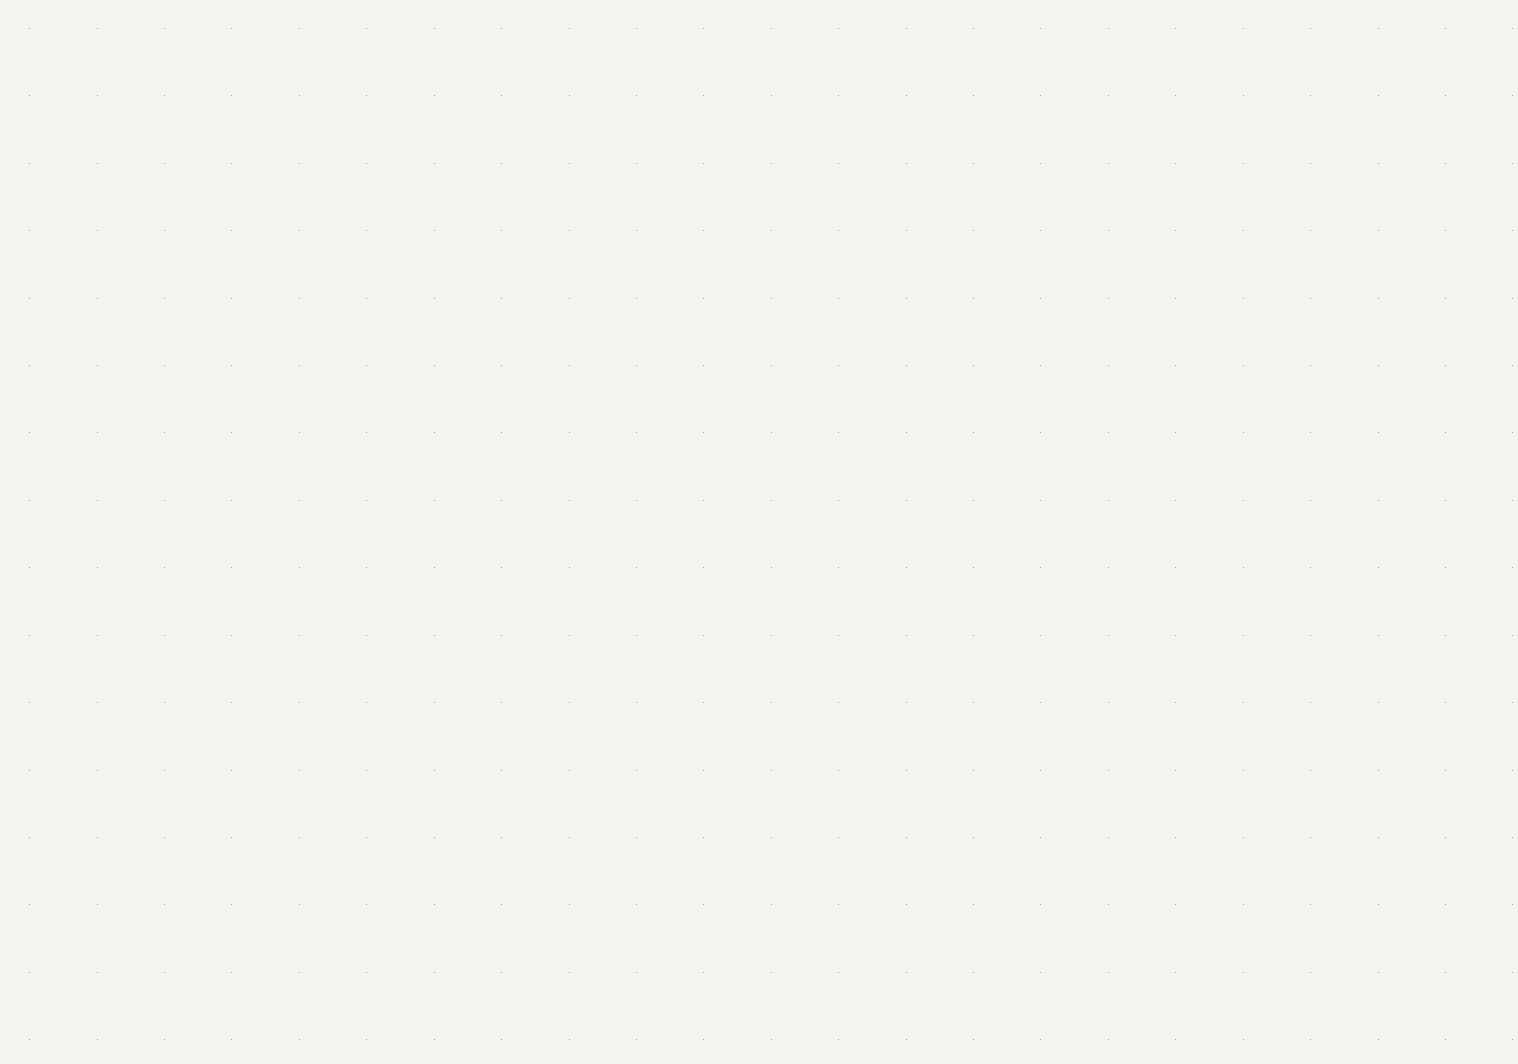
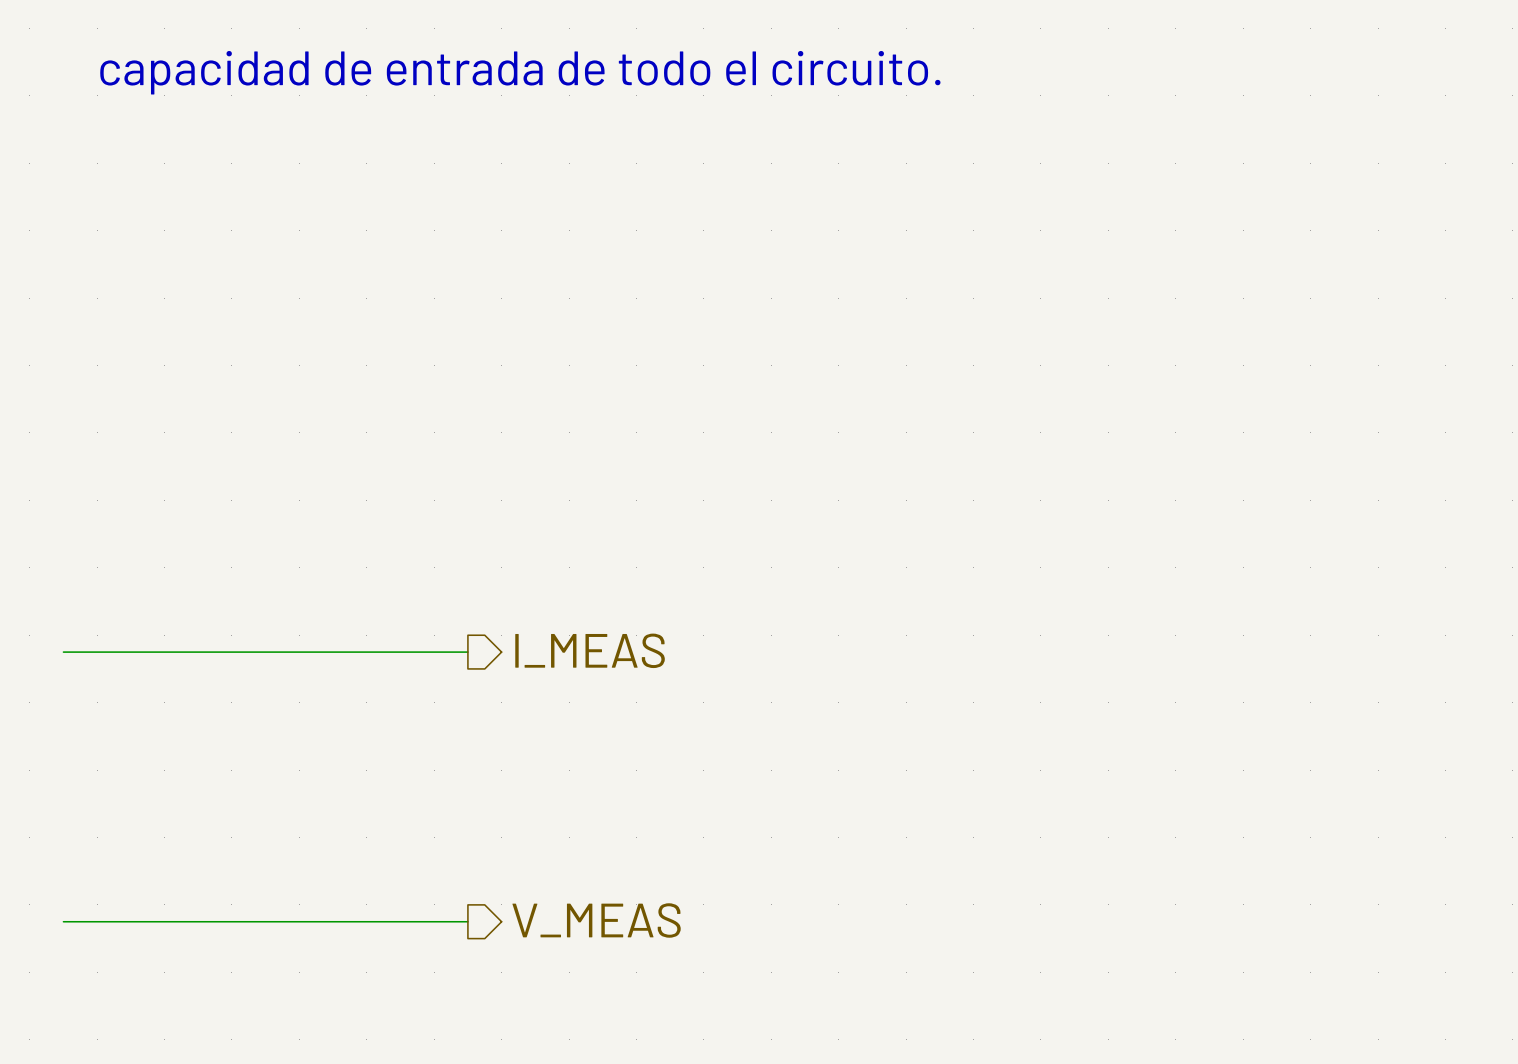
text: none -> capacidad de entrada de todo el circuito. (520, 72)
hierarchical label: none -> I_MEAS (590, 650)
wire: none -> (63, 652) (467, 652)
hierarchical label: none -> V_MEAS (596, 920)
wire: none -> (63, 921) (467, 921)

